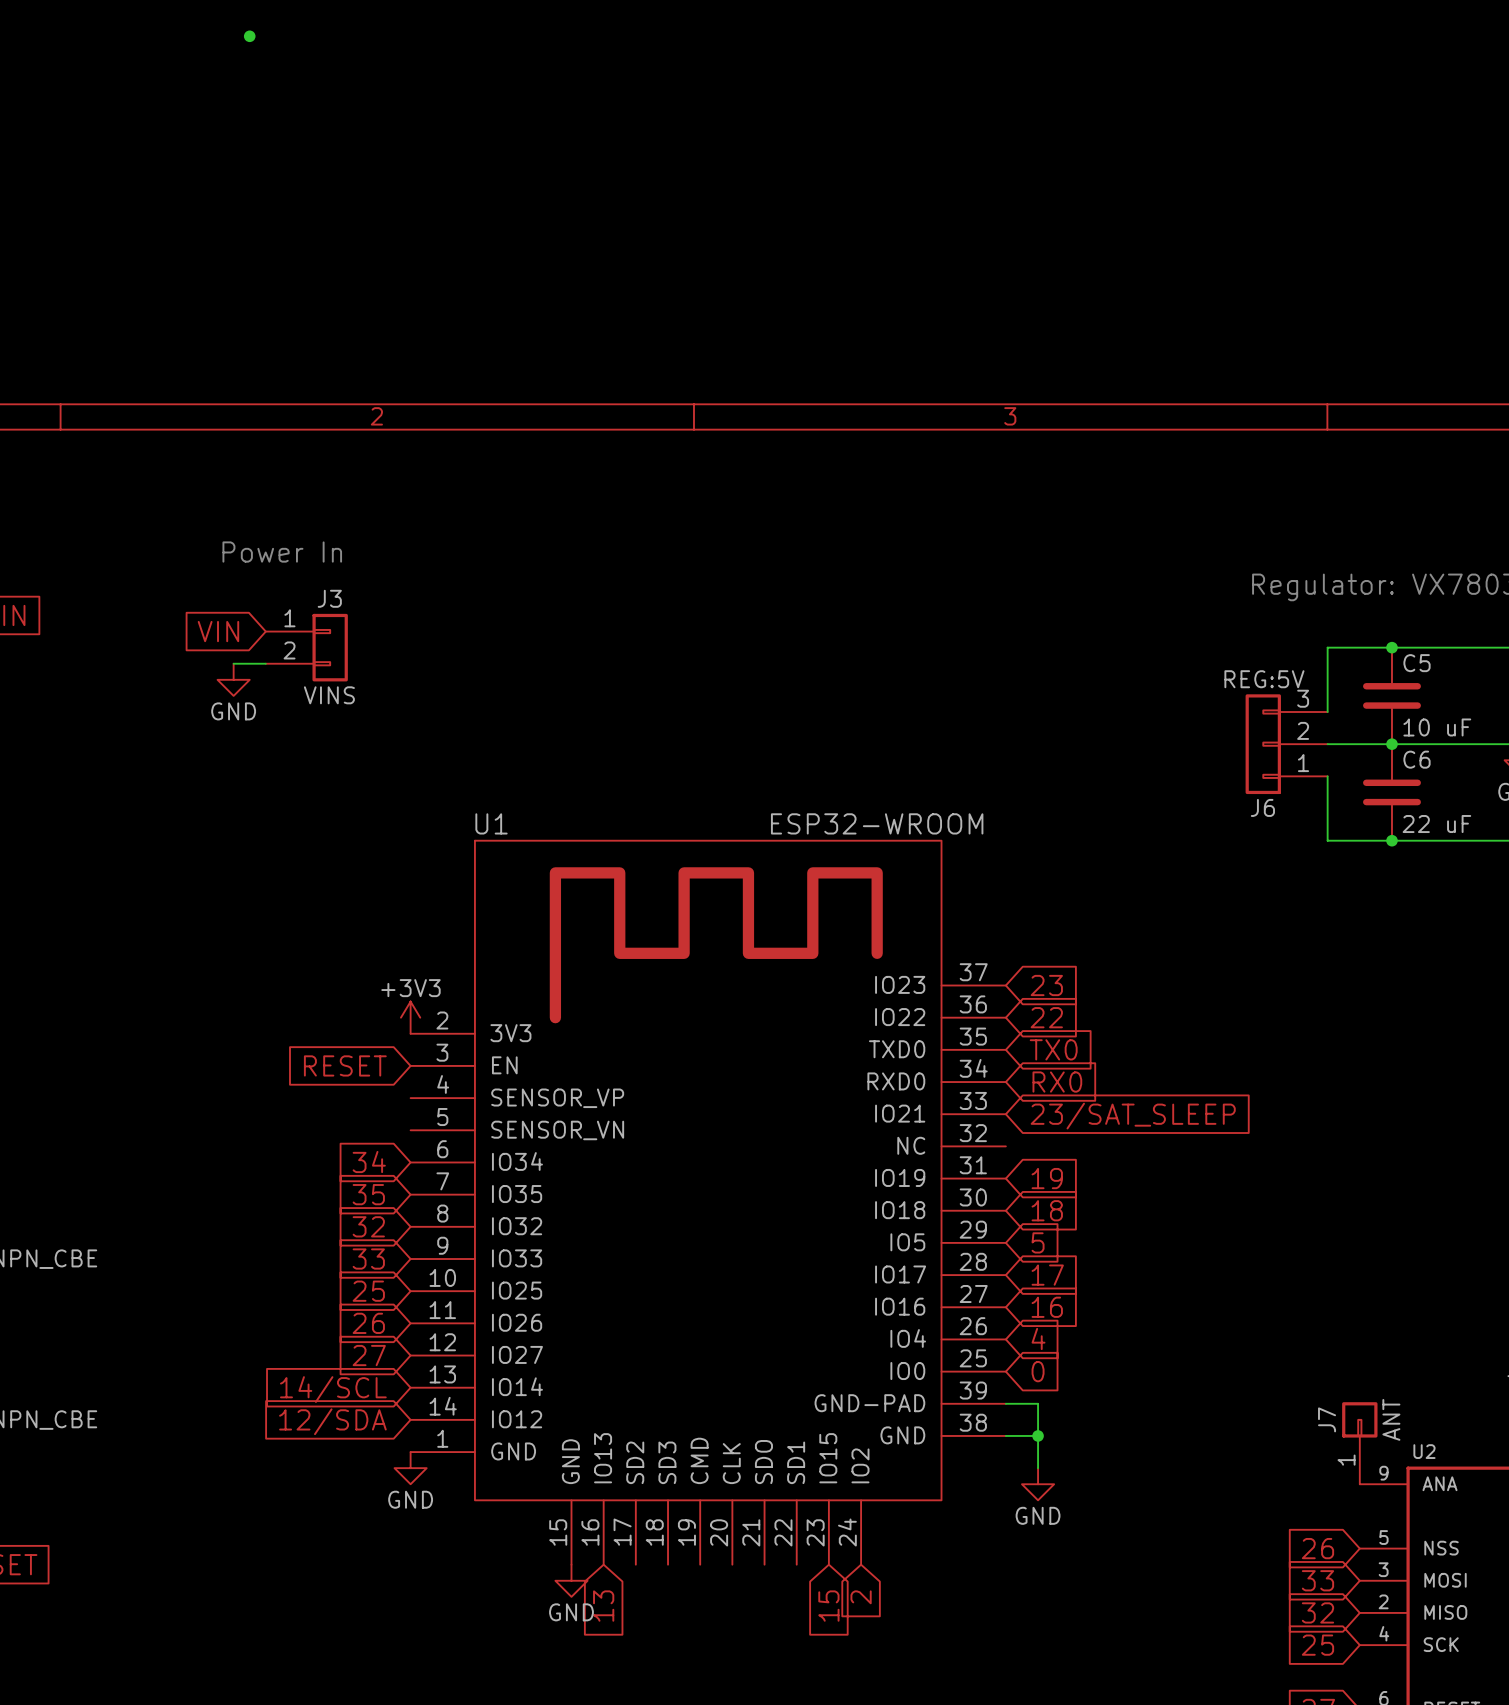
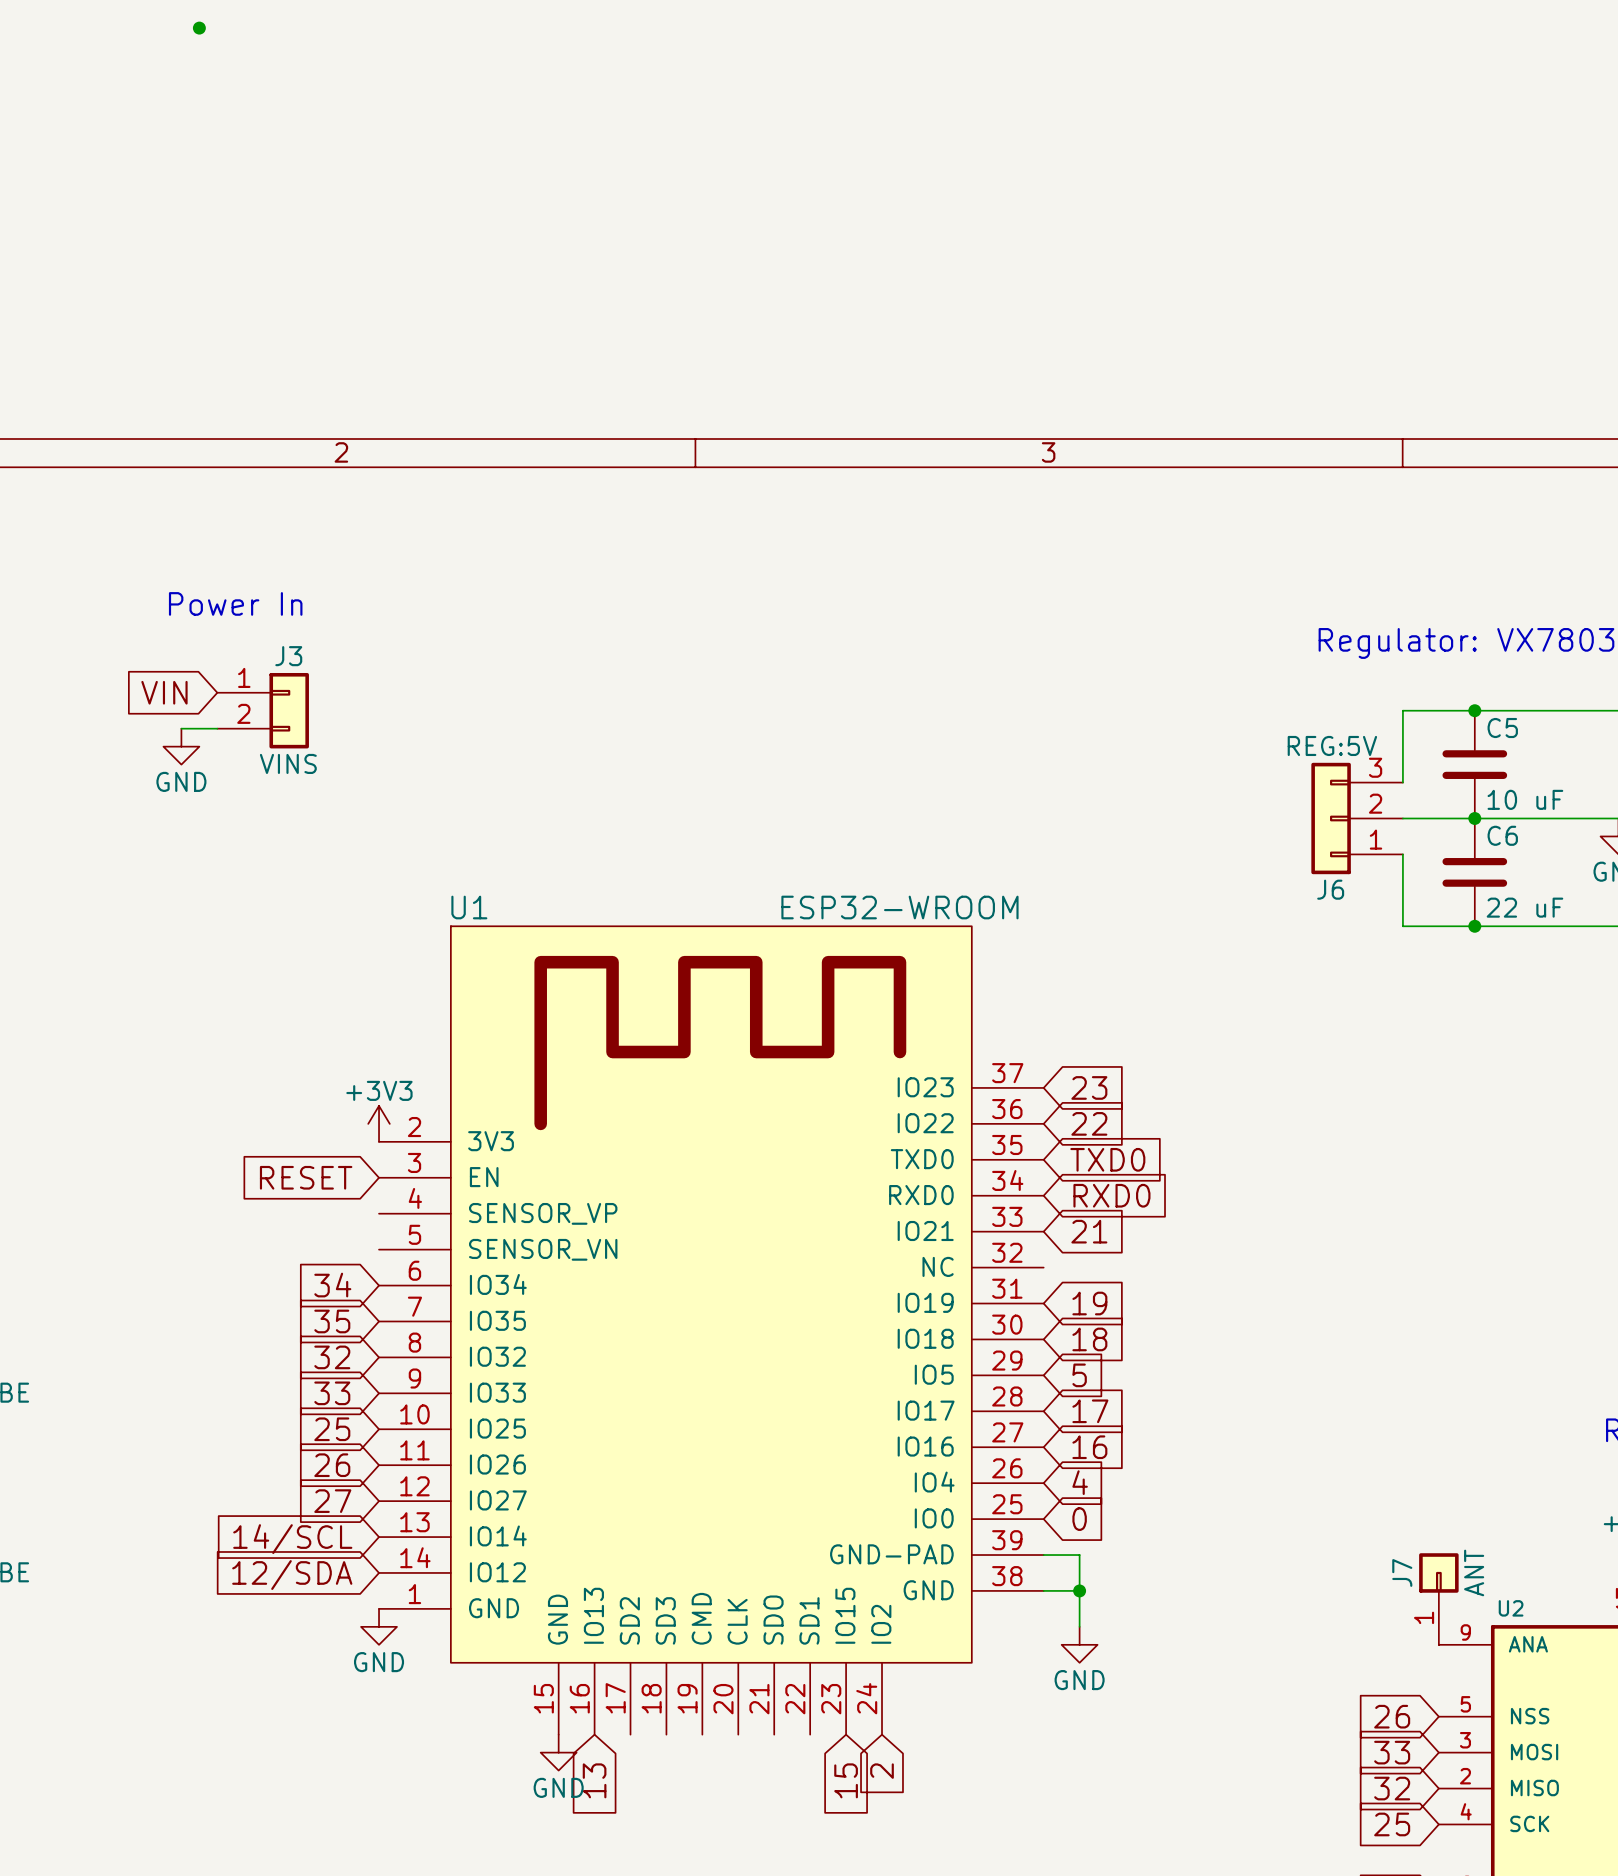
global label: TX0 (1053, 1049) -> TXD0 (1107, 1159)
global label: RX0 (1057, 1082) -> RXD0 (1111, 1195)
global label: 23/SAT_SLEEP (1133, 1116) -> 21 (1089, 1231)

